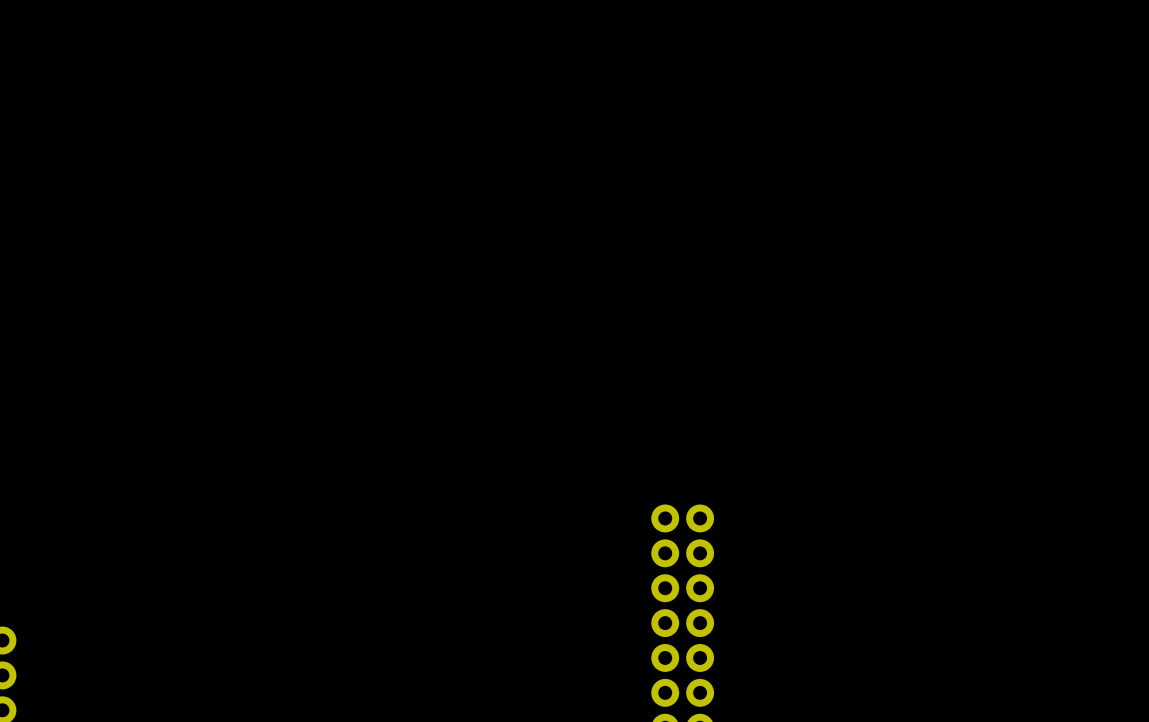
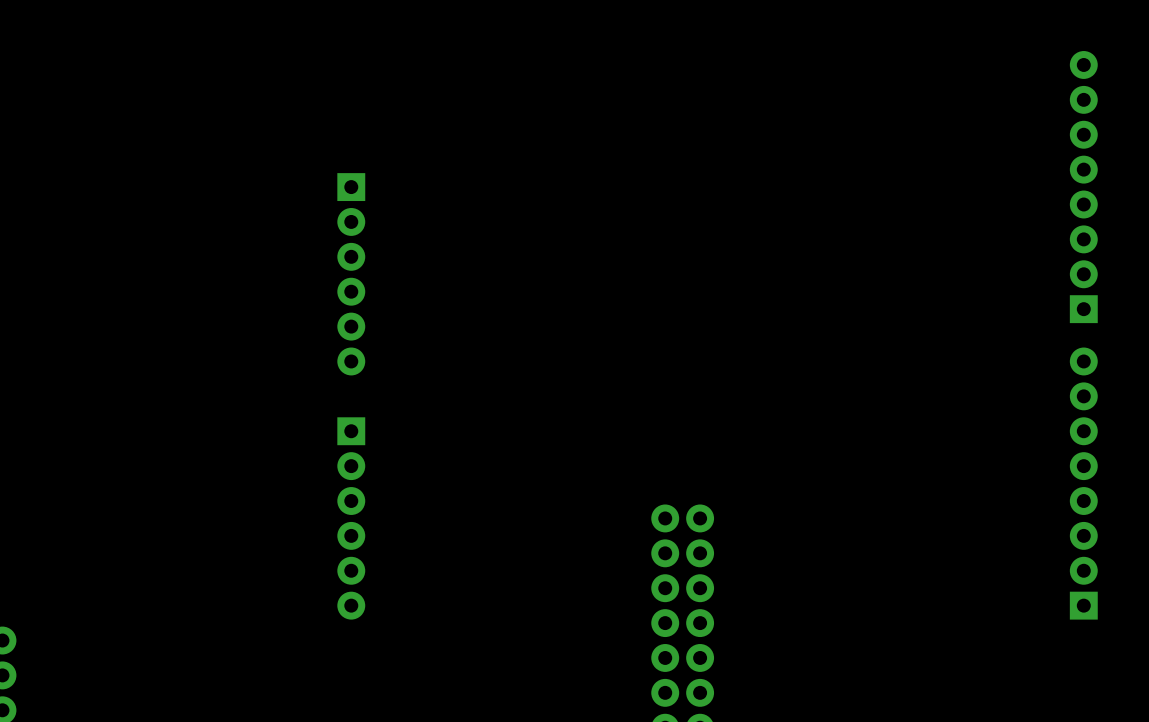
part: none -> (1083, 187)
part: none -> (351, 274)
part: none -> (1083, 483)
part: none -> (351, 518)

